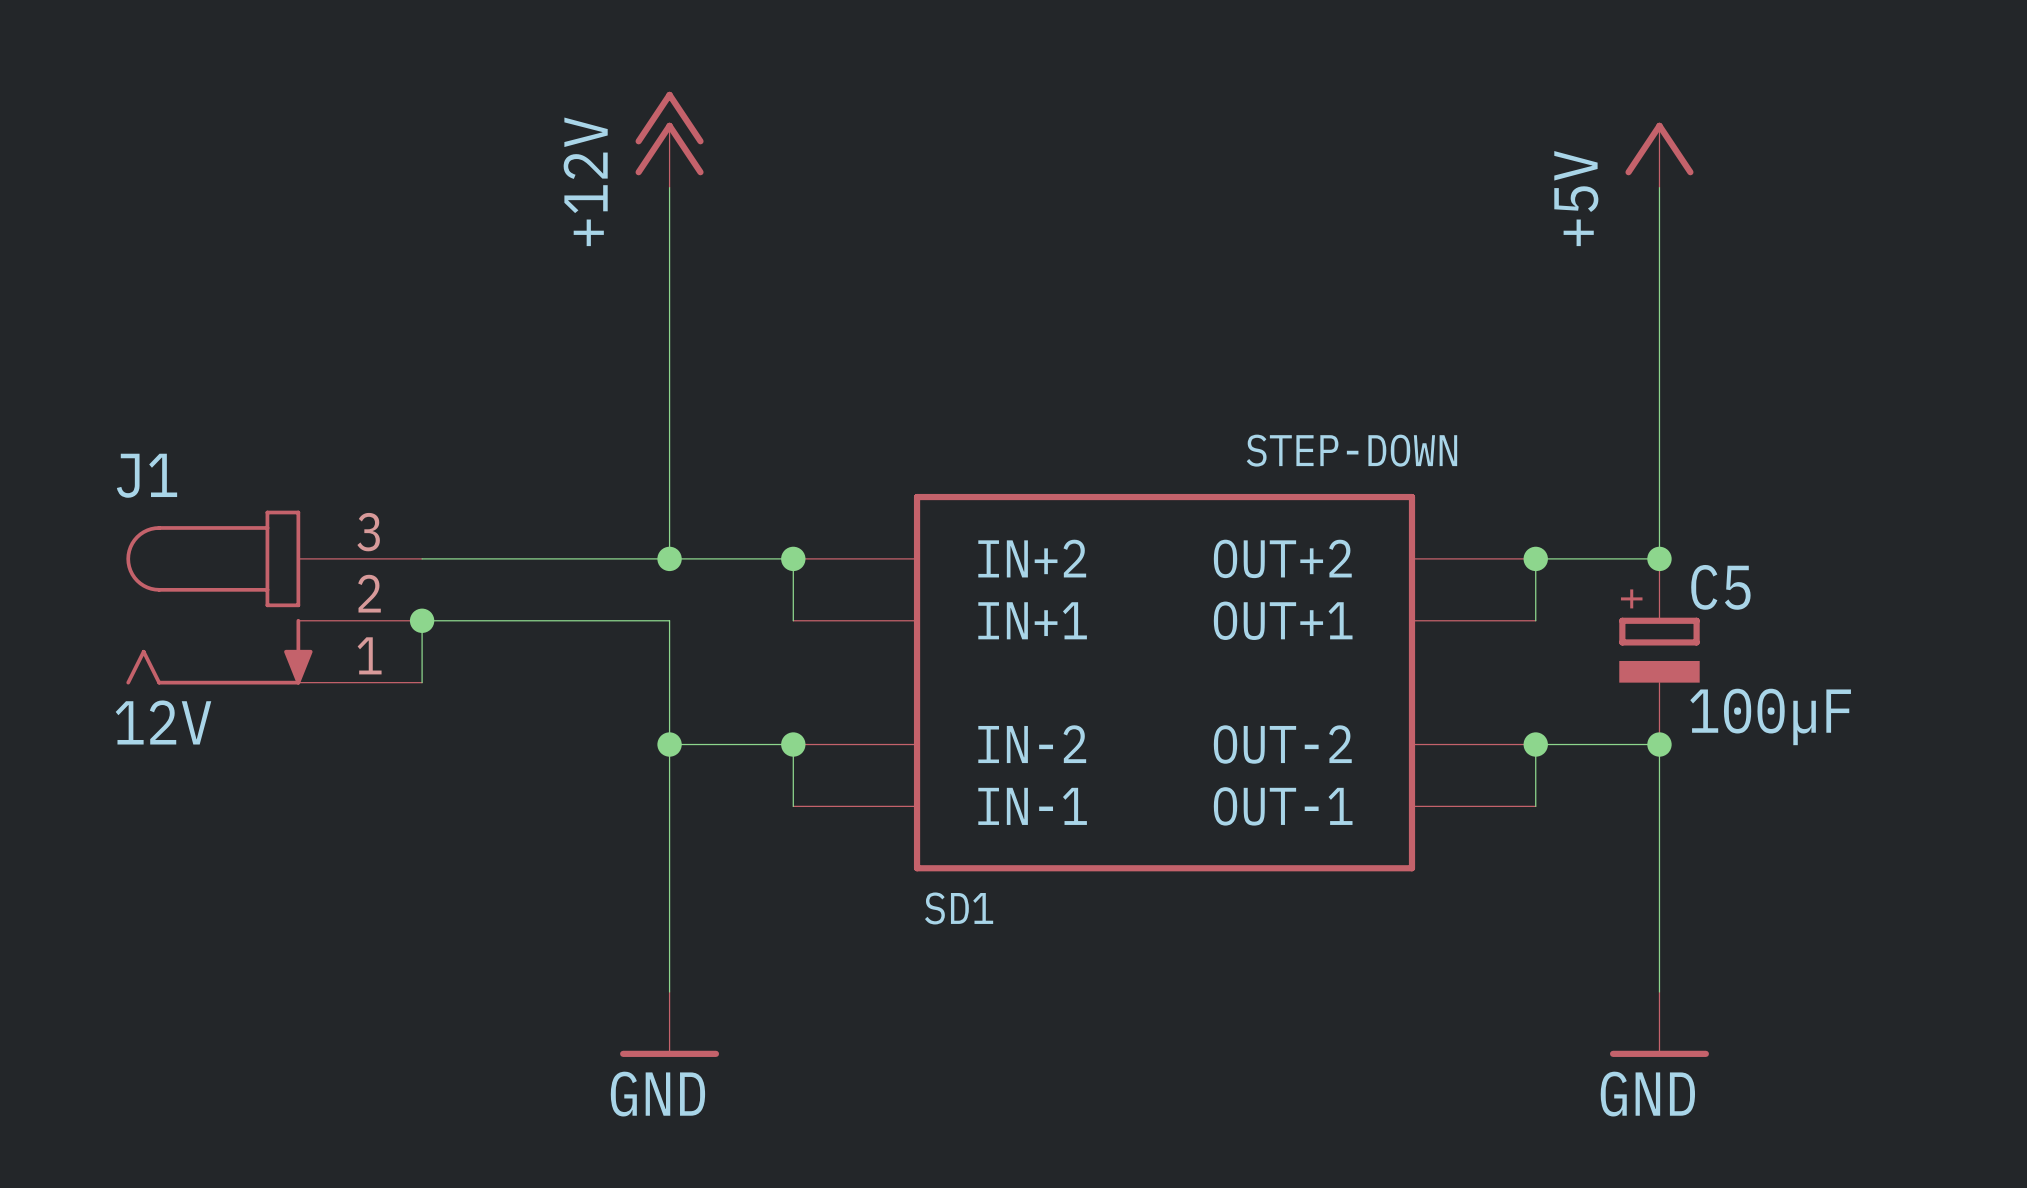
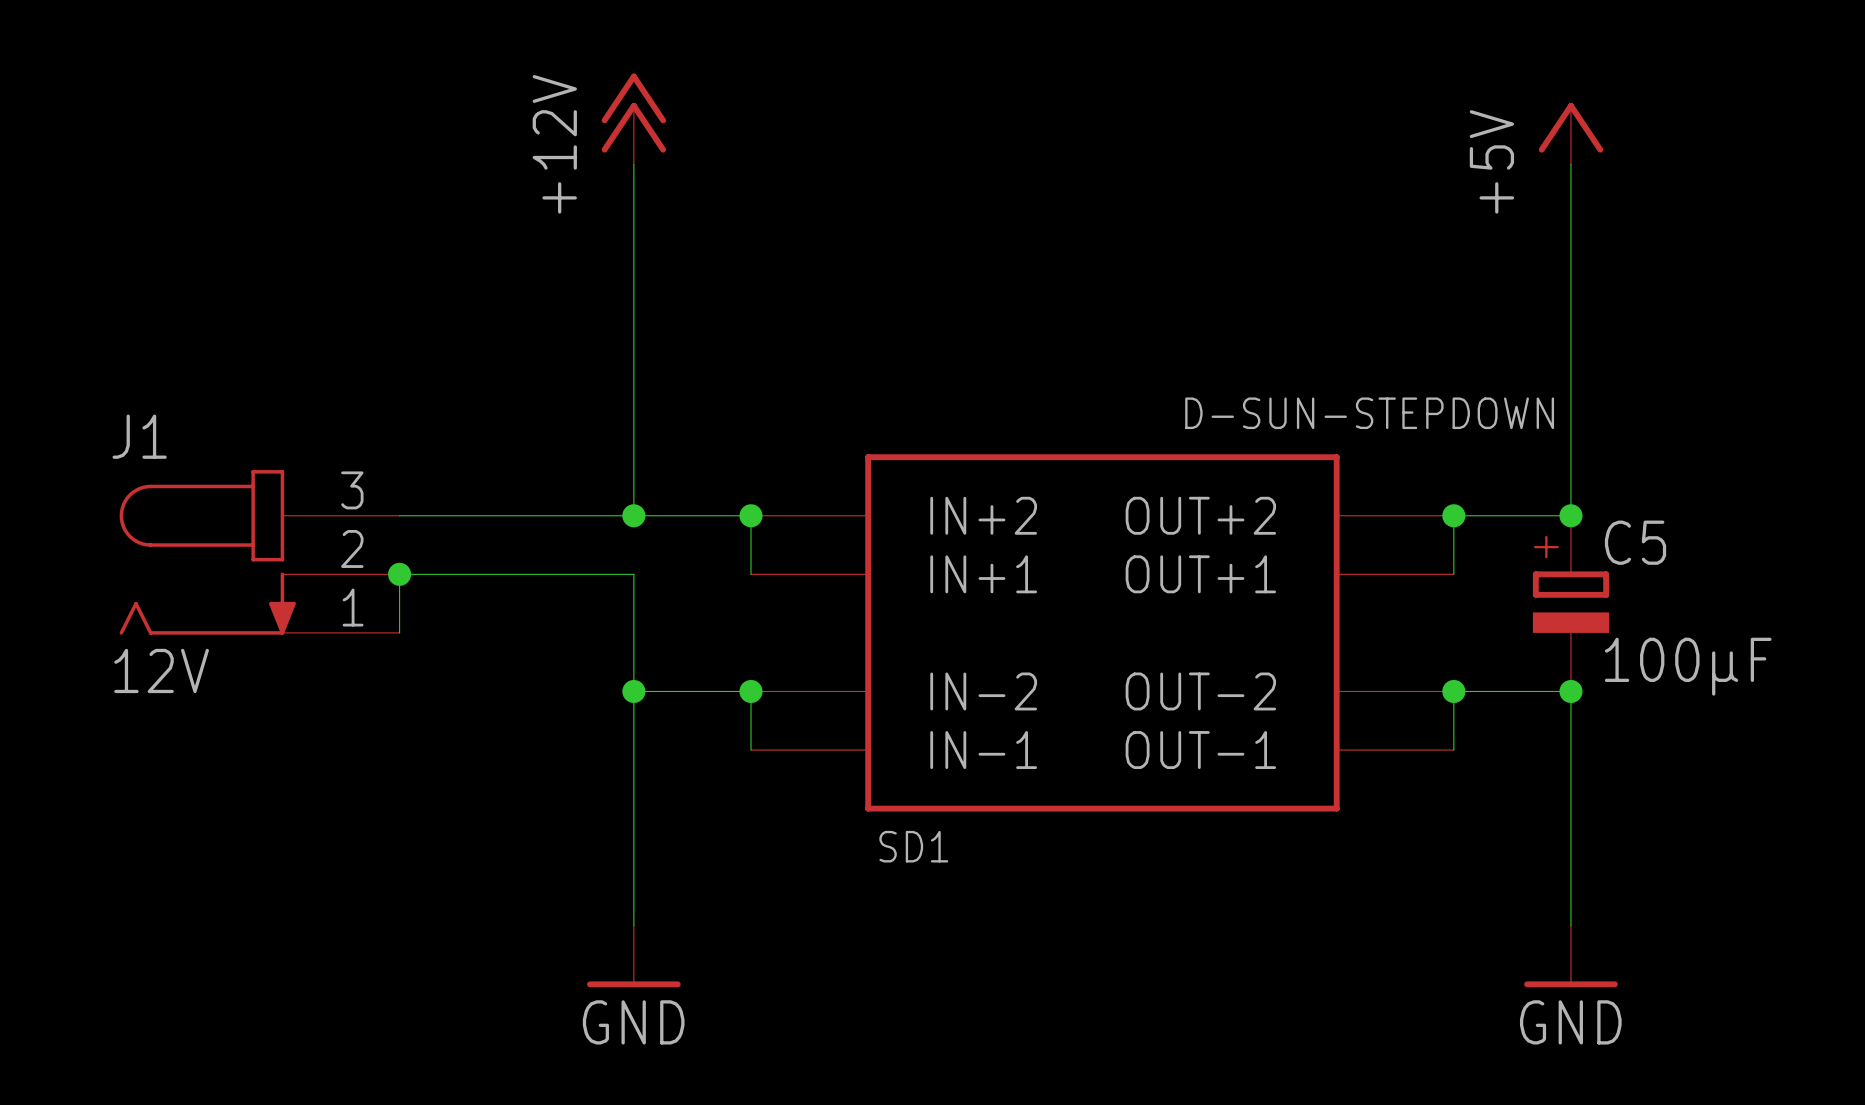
SD1 value: STEP-DOWN (1351, 450) -> D-SUN-STEPDOWN (1369, 413)

